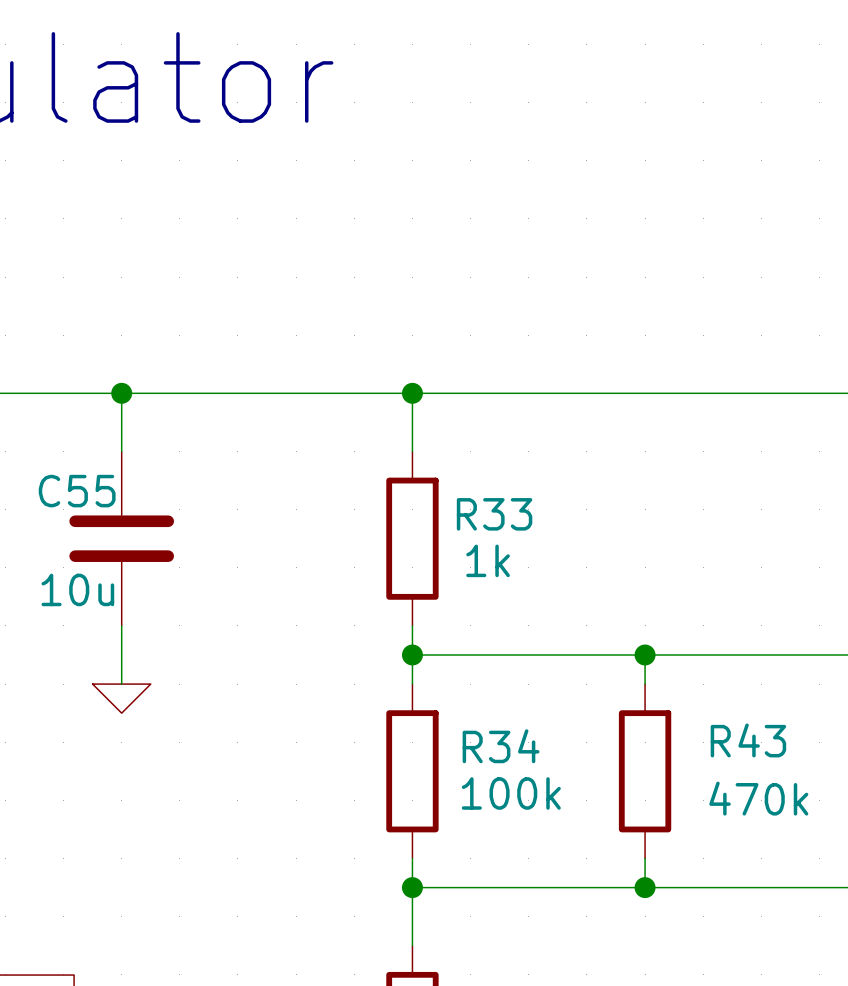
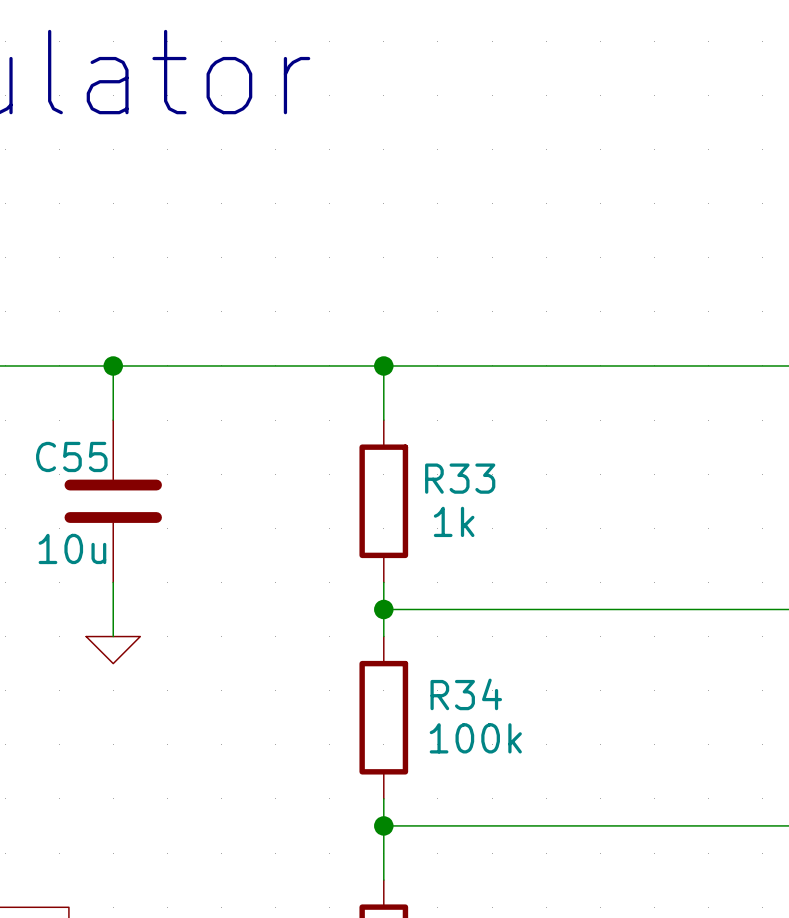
wire: (645, 655) (645, 684) -> none
junction: (645, 655) -> none
R43: 470k (645, 771) -> none
wire: (645, 858) (645, 887) -> none
junction: (645, 887) -> none

